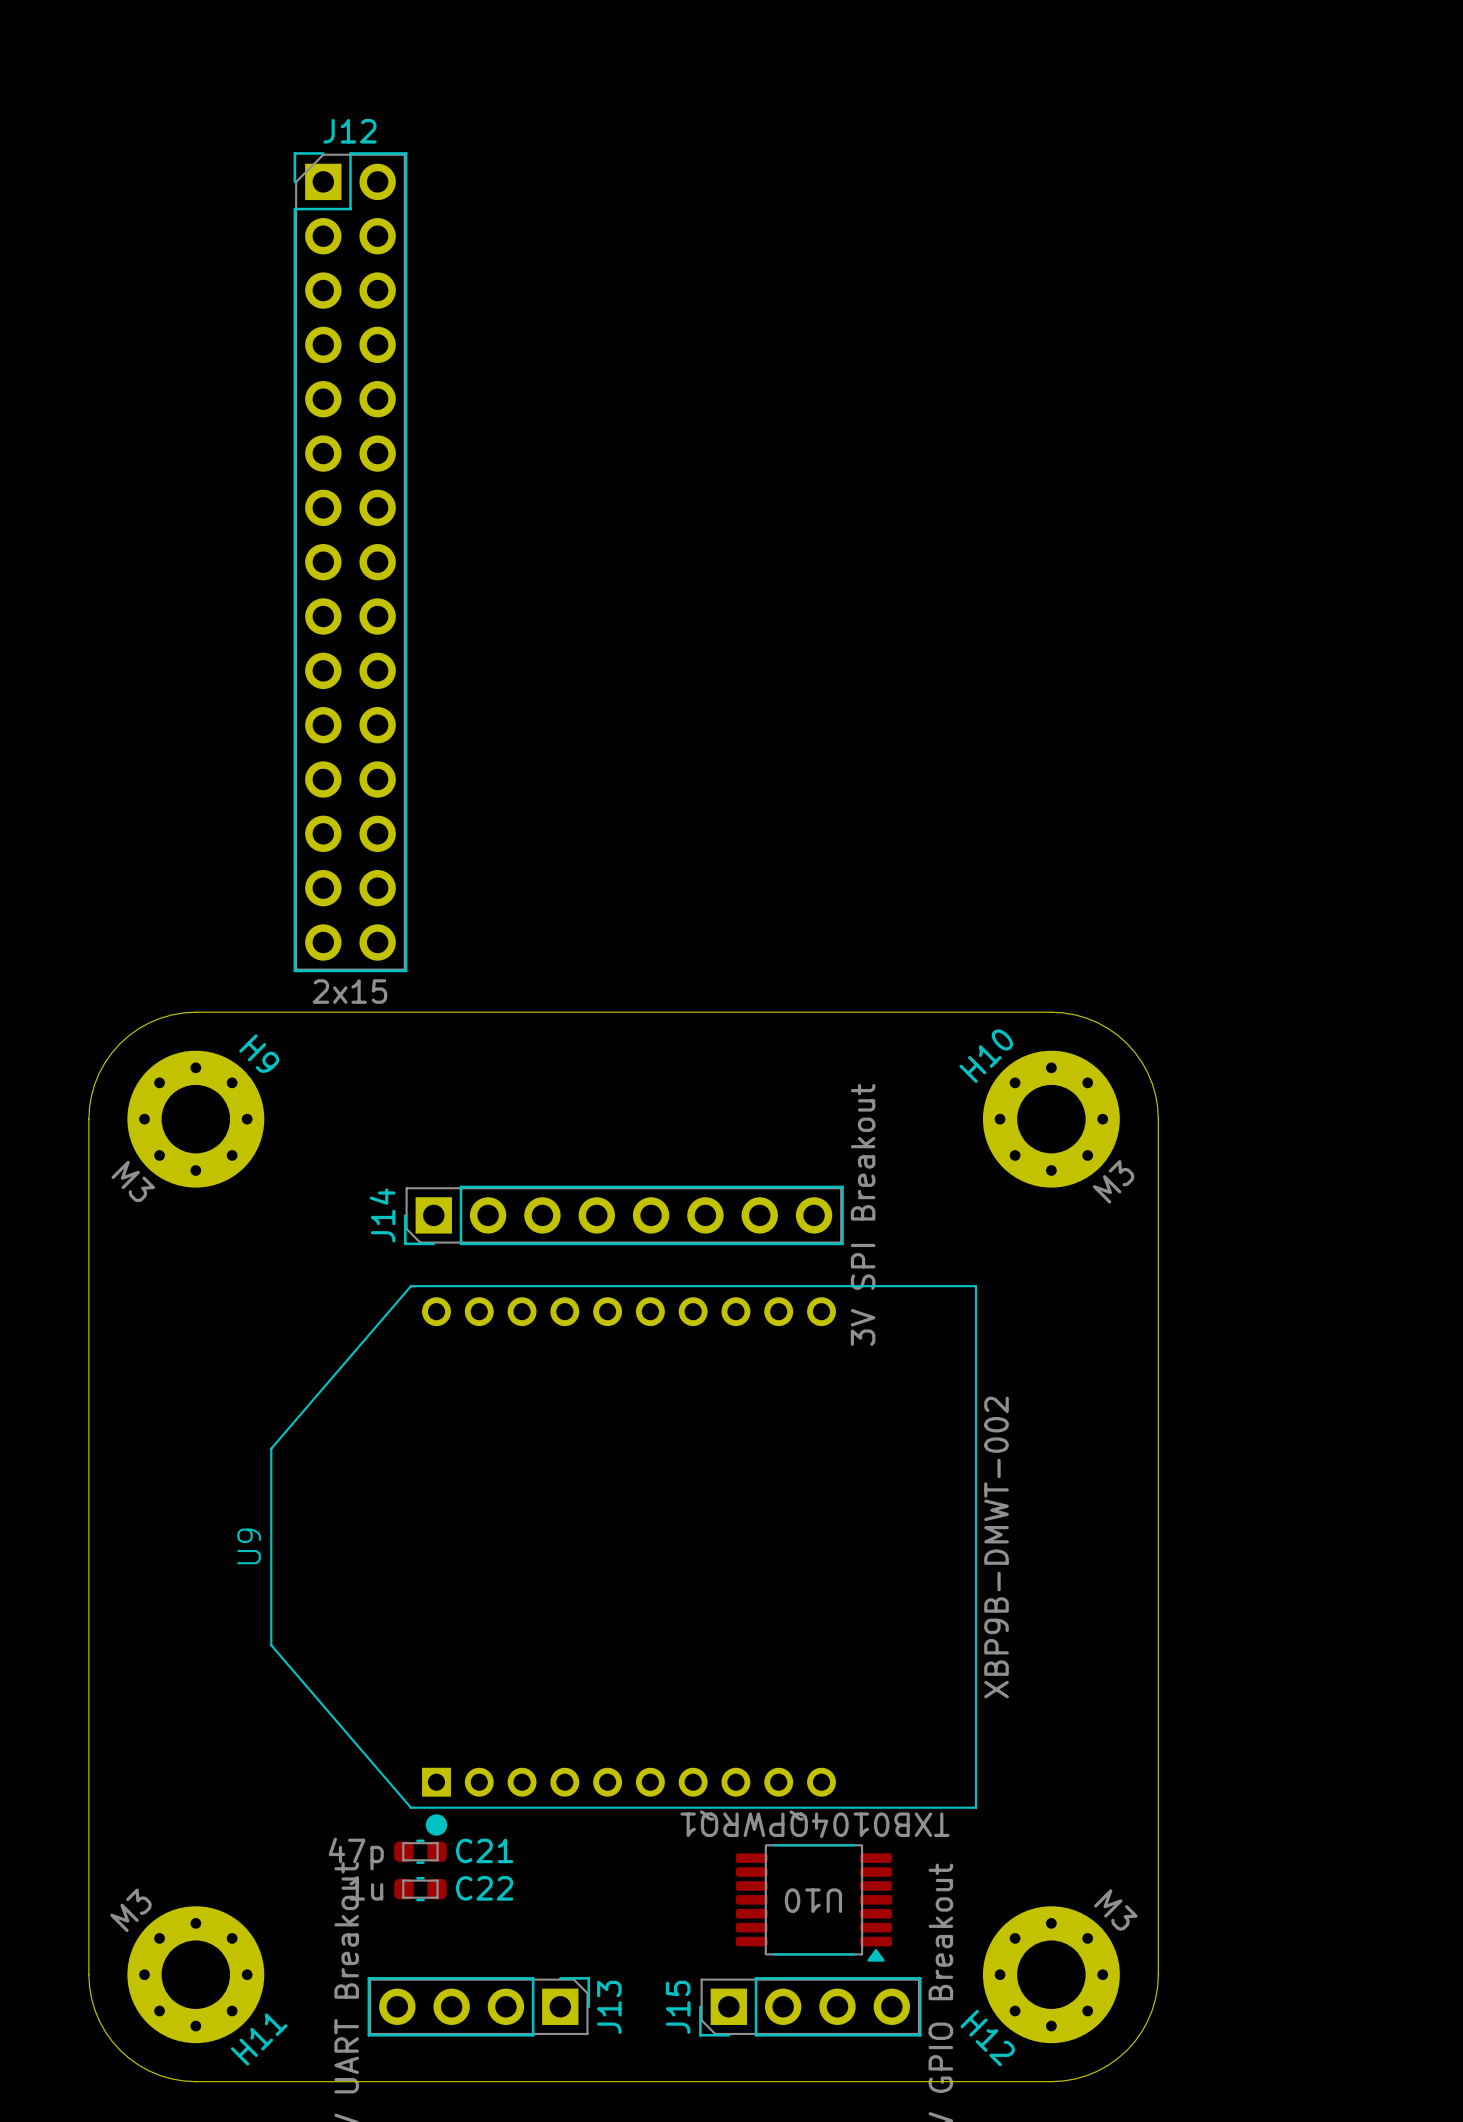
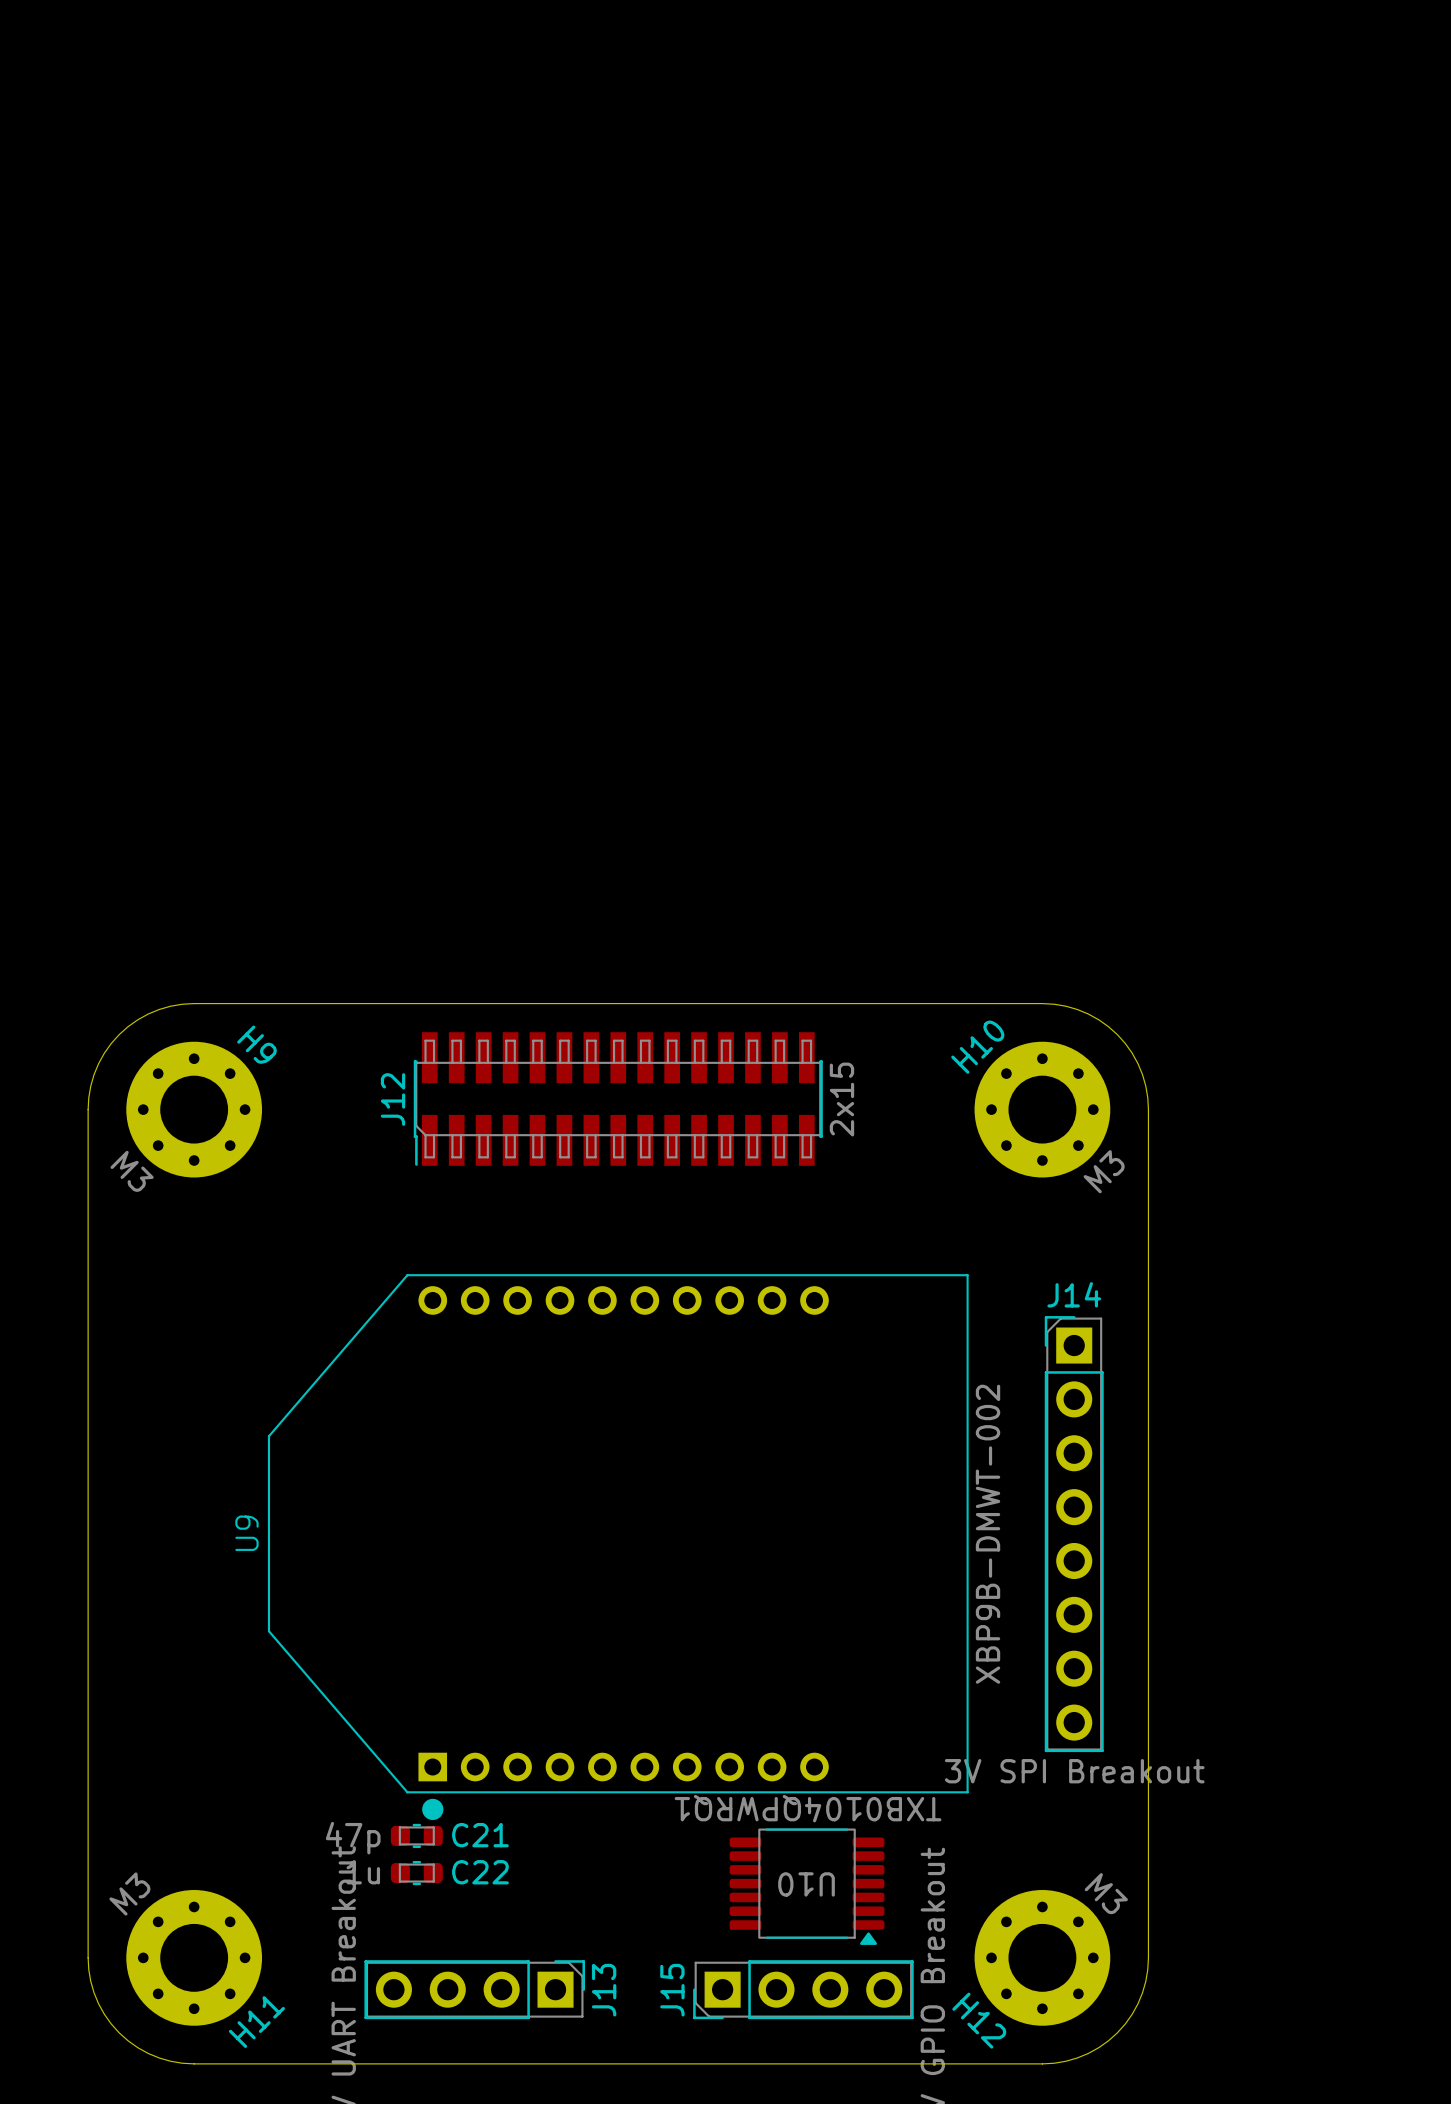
J12 name position: J12 (349, 131) -> J12 (393, 1099)
J12 footprint: [293, 152, 408, 973] -> [413, 1032, 823, 1166]
J12 value position: 2x15 (349, 991) -> 2x15 (841, 1099)
J14 rotation: 0° (623, 1215) -> 90° clockwise (1074, 1534)
J14 position: (623, 1215) -> (1074, 1534)

